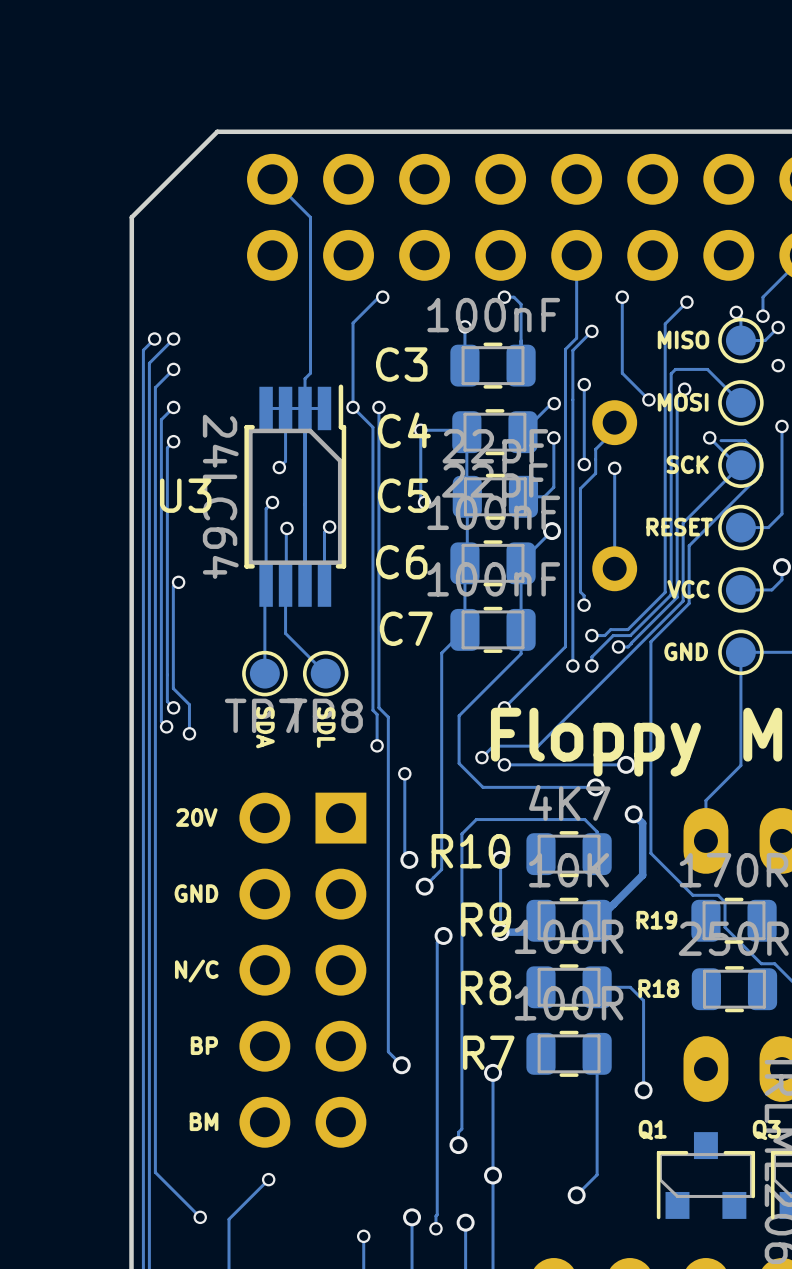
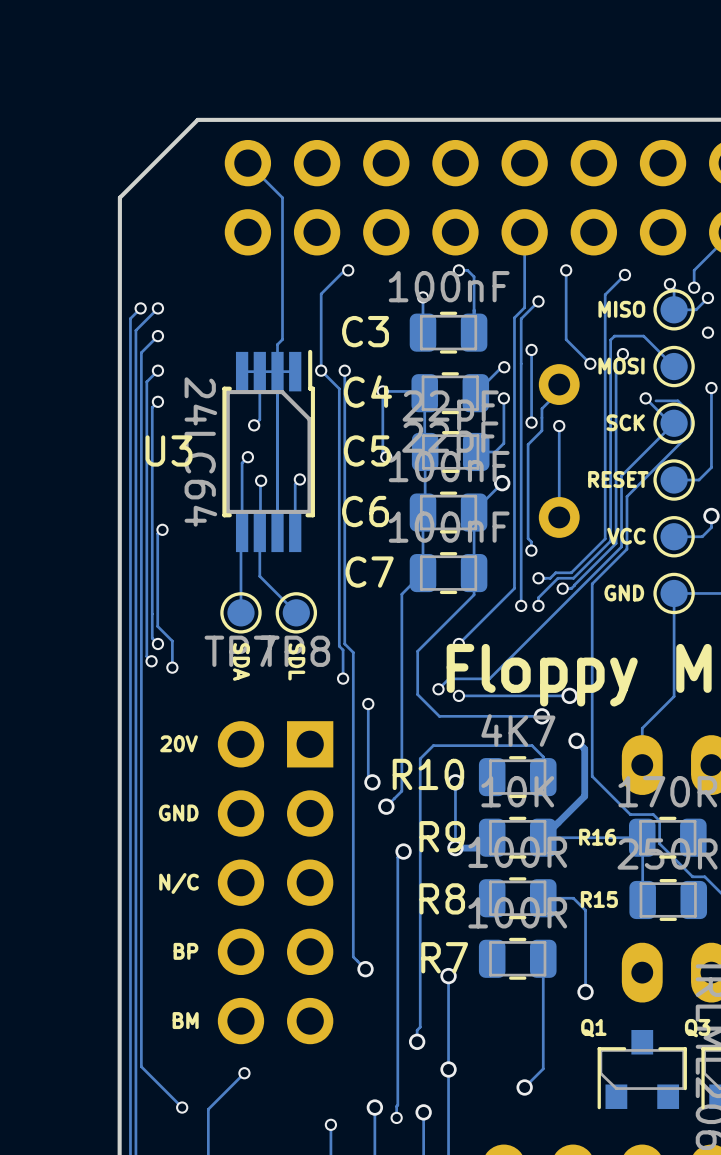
track: none -> (543, 837) (642, 837) (642, 899)
R19 name: R19 (656, 920) -> R16 (597, 837)
R18 name: R18 (658, 988) -> R15 (599, 899)

